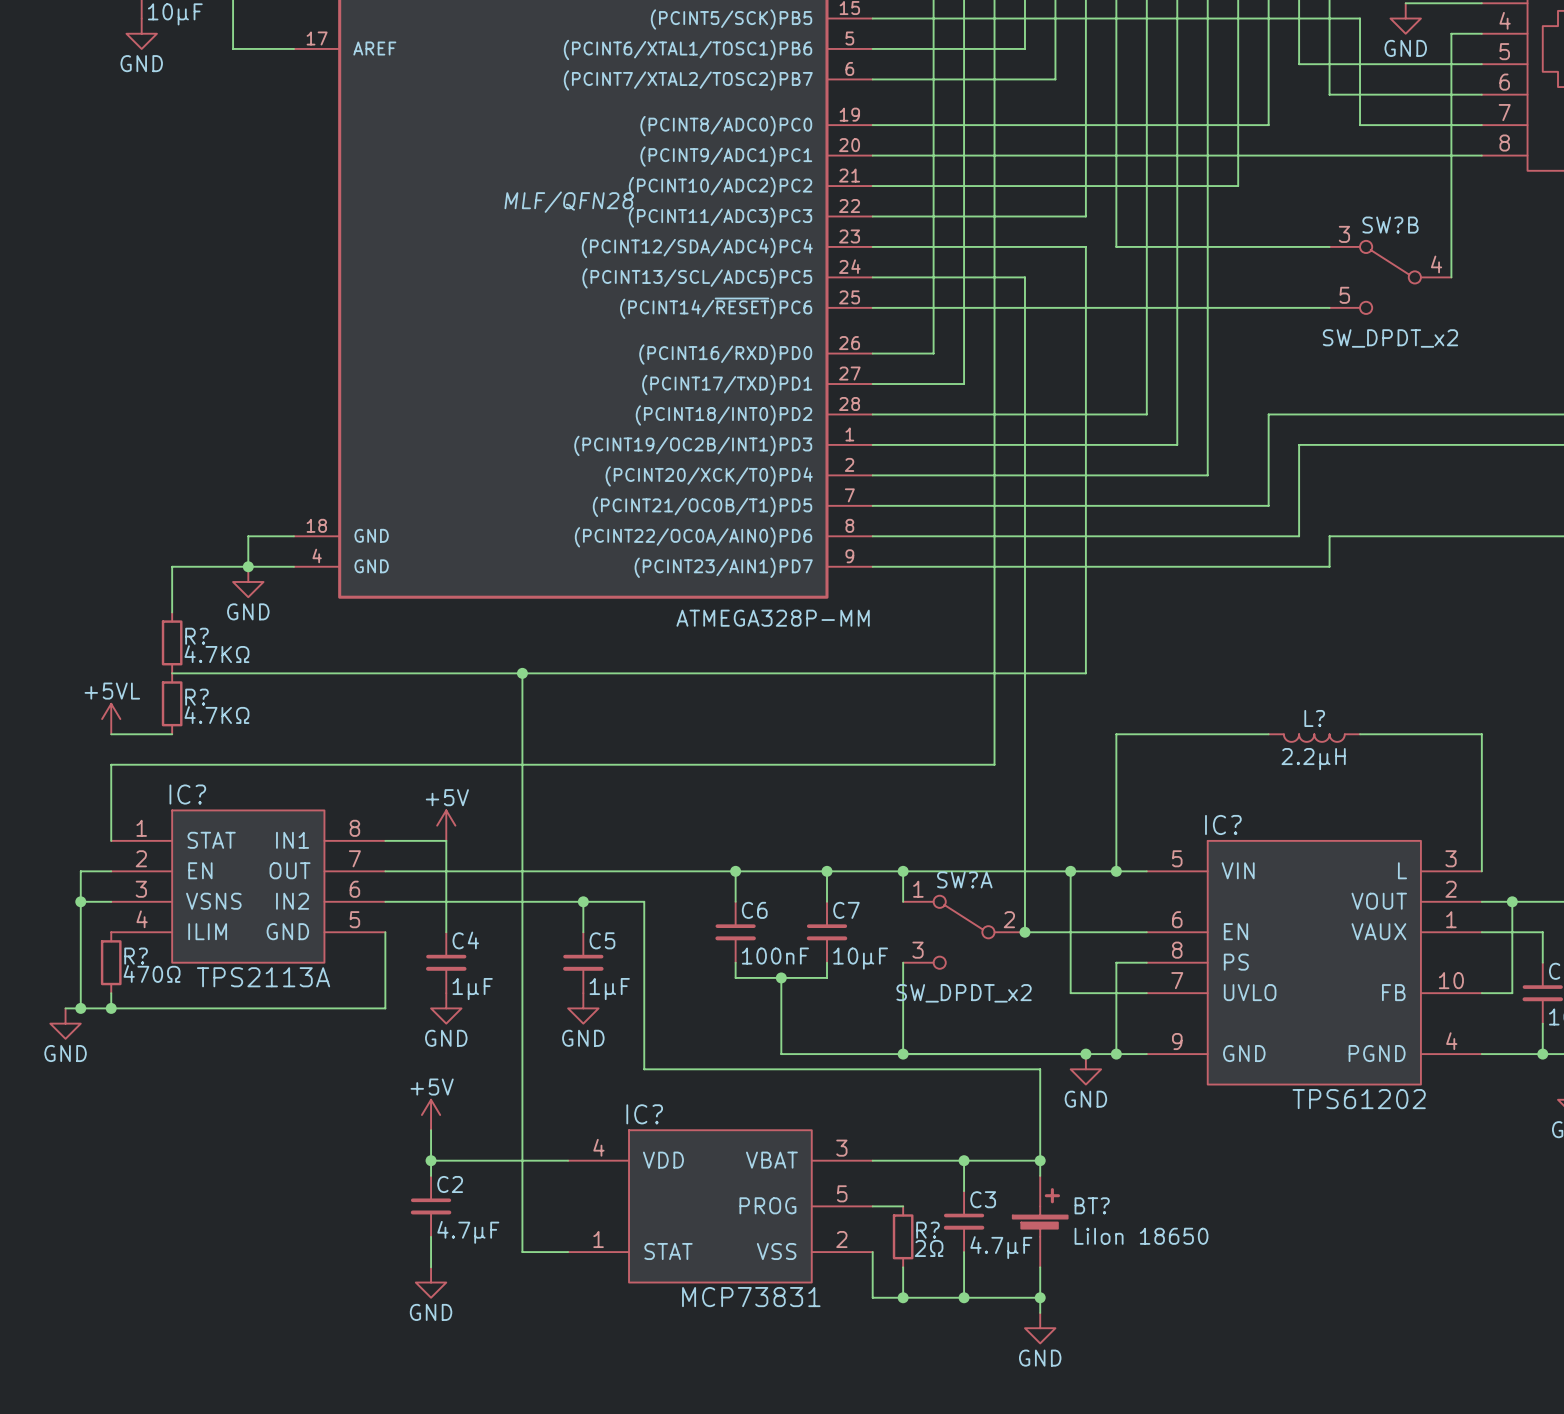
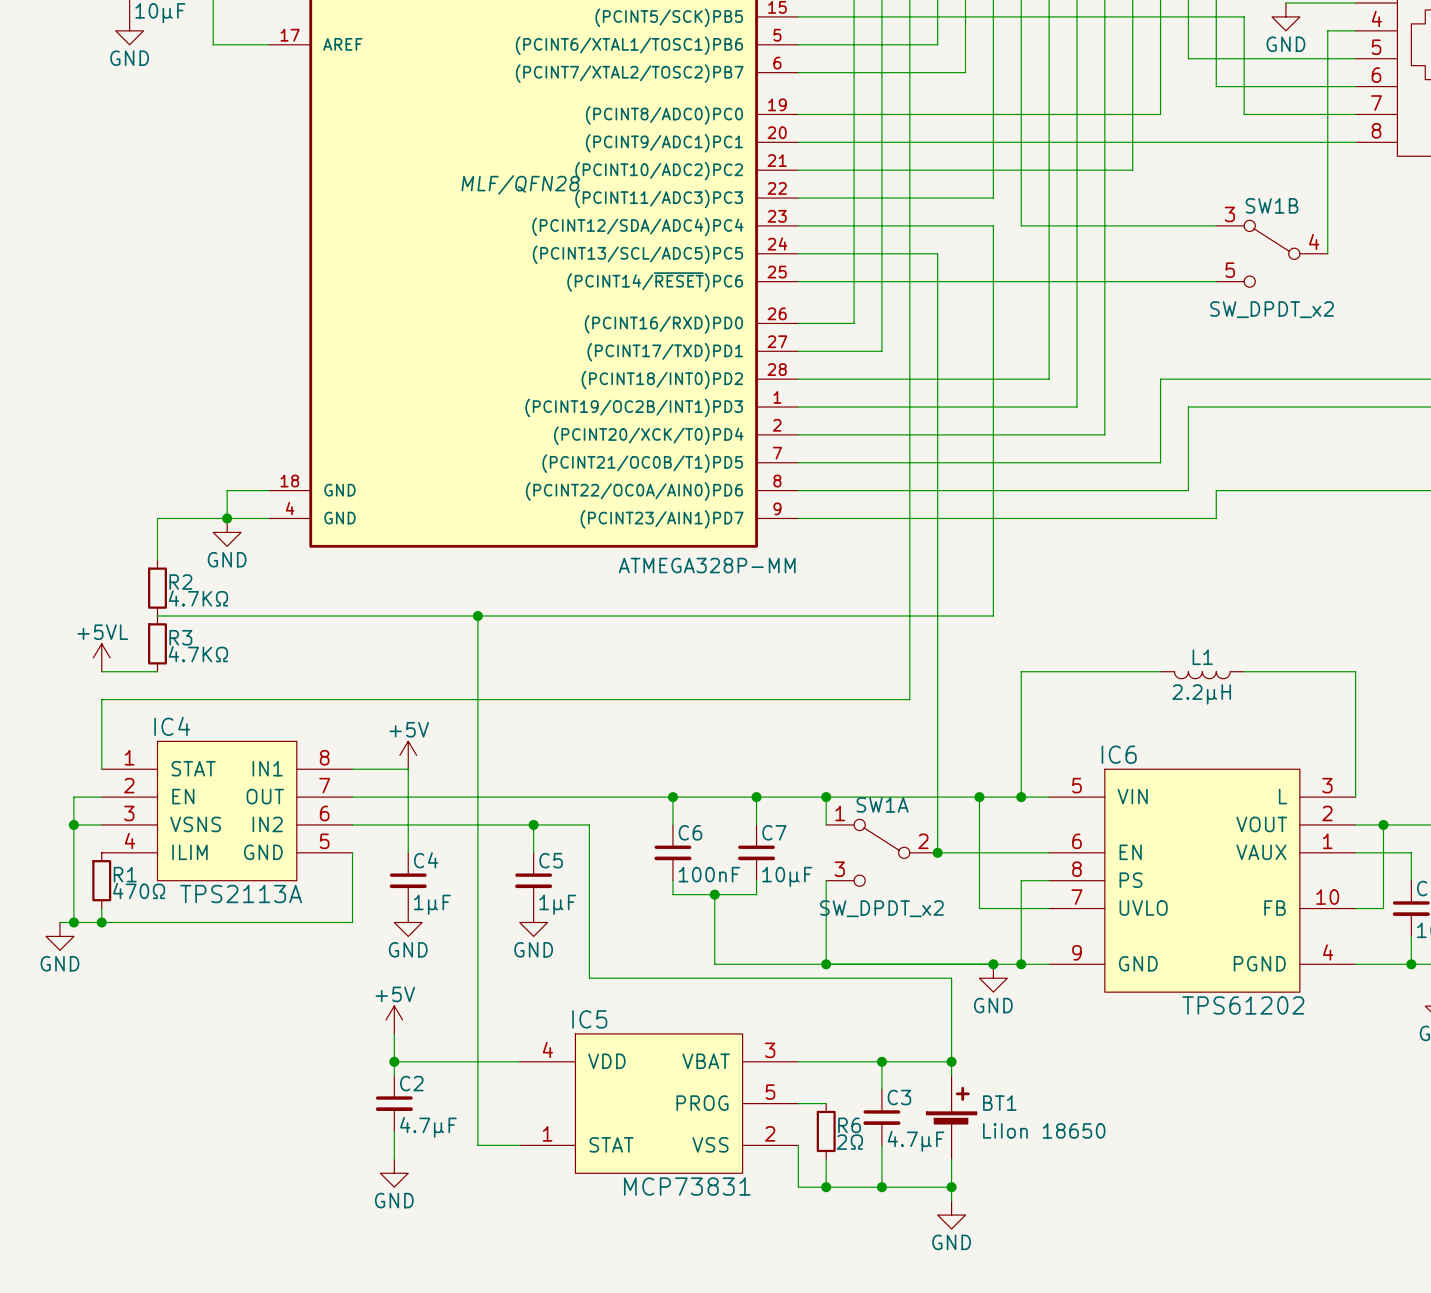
SW?B name: SW?B (1390, 225) -> SW1B (1272, 205)
R? name: R? (197, 636) -> R2 (180, 582)
R? name: R? (197, 697) -> R3 (180, 637)
L? name: L? (1314, 718) -> L1 (1202, 657)
IC? name: IC? (187, 794) -> IC4 (172, 726)
IC? name: IC? (1223, 824) -> IC6 (1119, 754)
SW?A name: SW?A (964, 879) -> SW1A (882, 804)
R? name: R? (136, 956) -> R1 (125, 874)
IC? name: IC? (644, 1114) -> IC5 (589, 1019)
BT? name: BT? (1092, 1205) -> BT1 (999, 1103)
R? name: R? (927, 1230) -> R6 (849, 1125)

